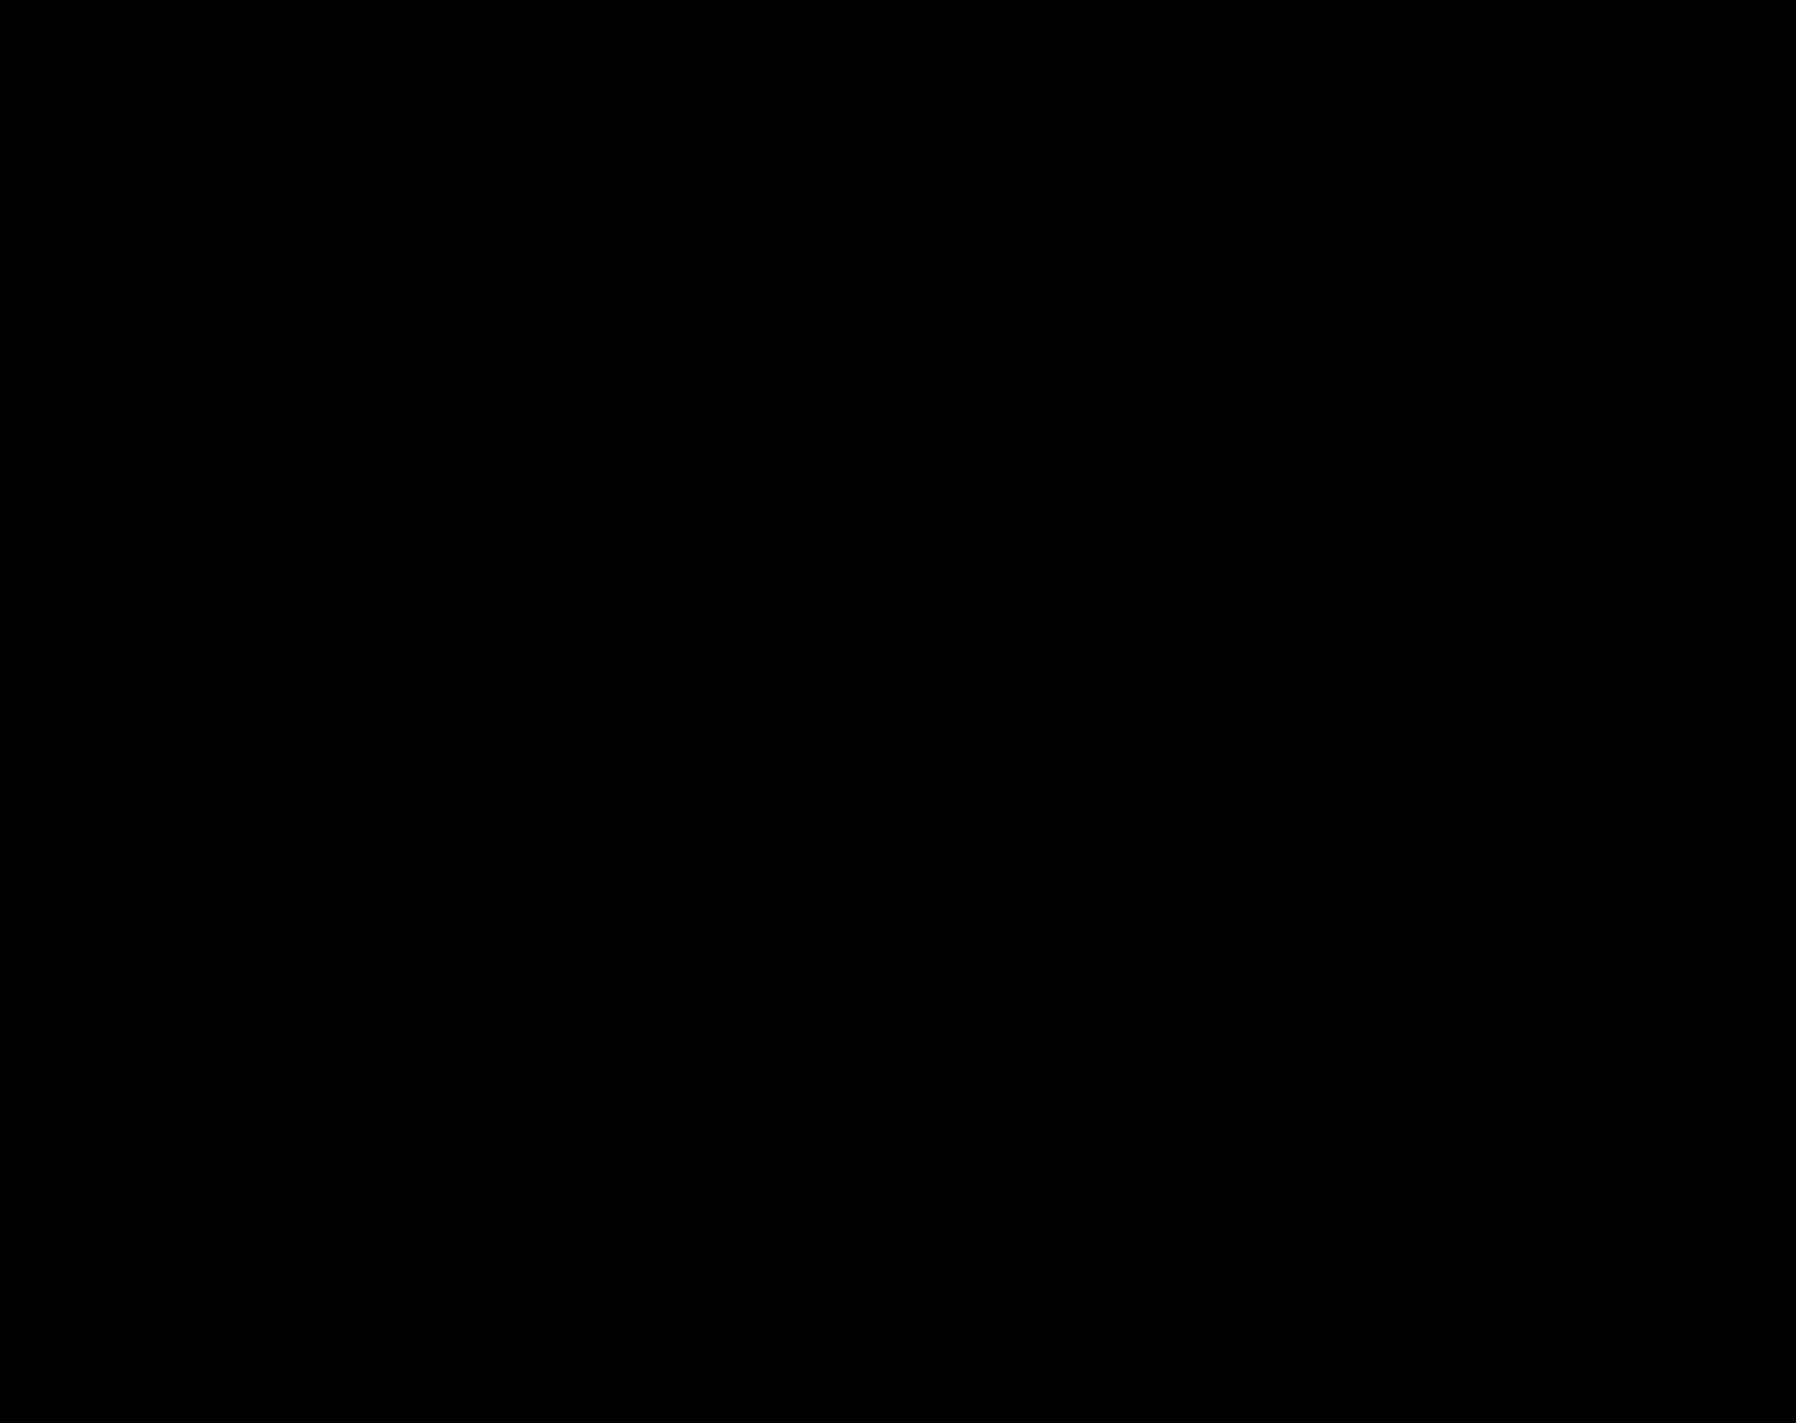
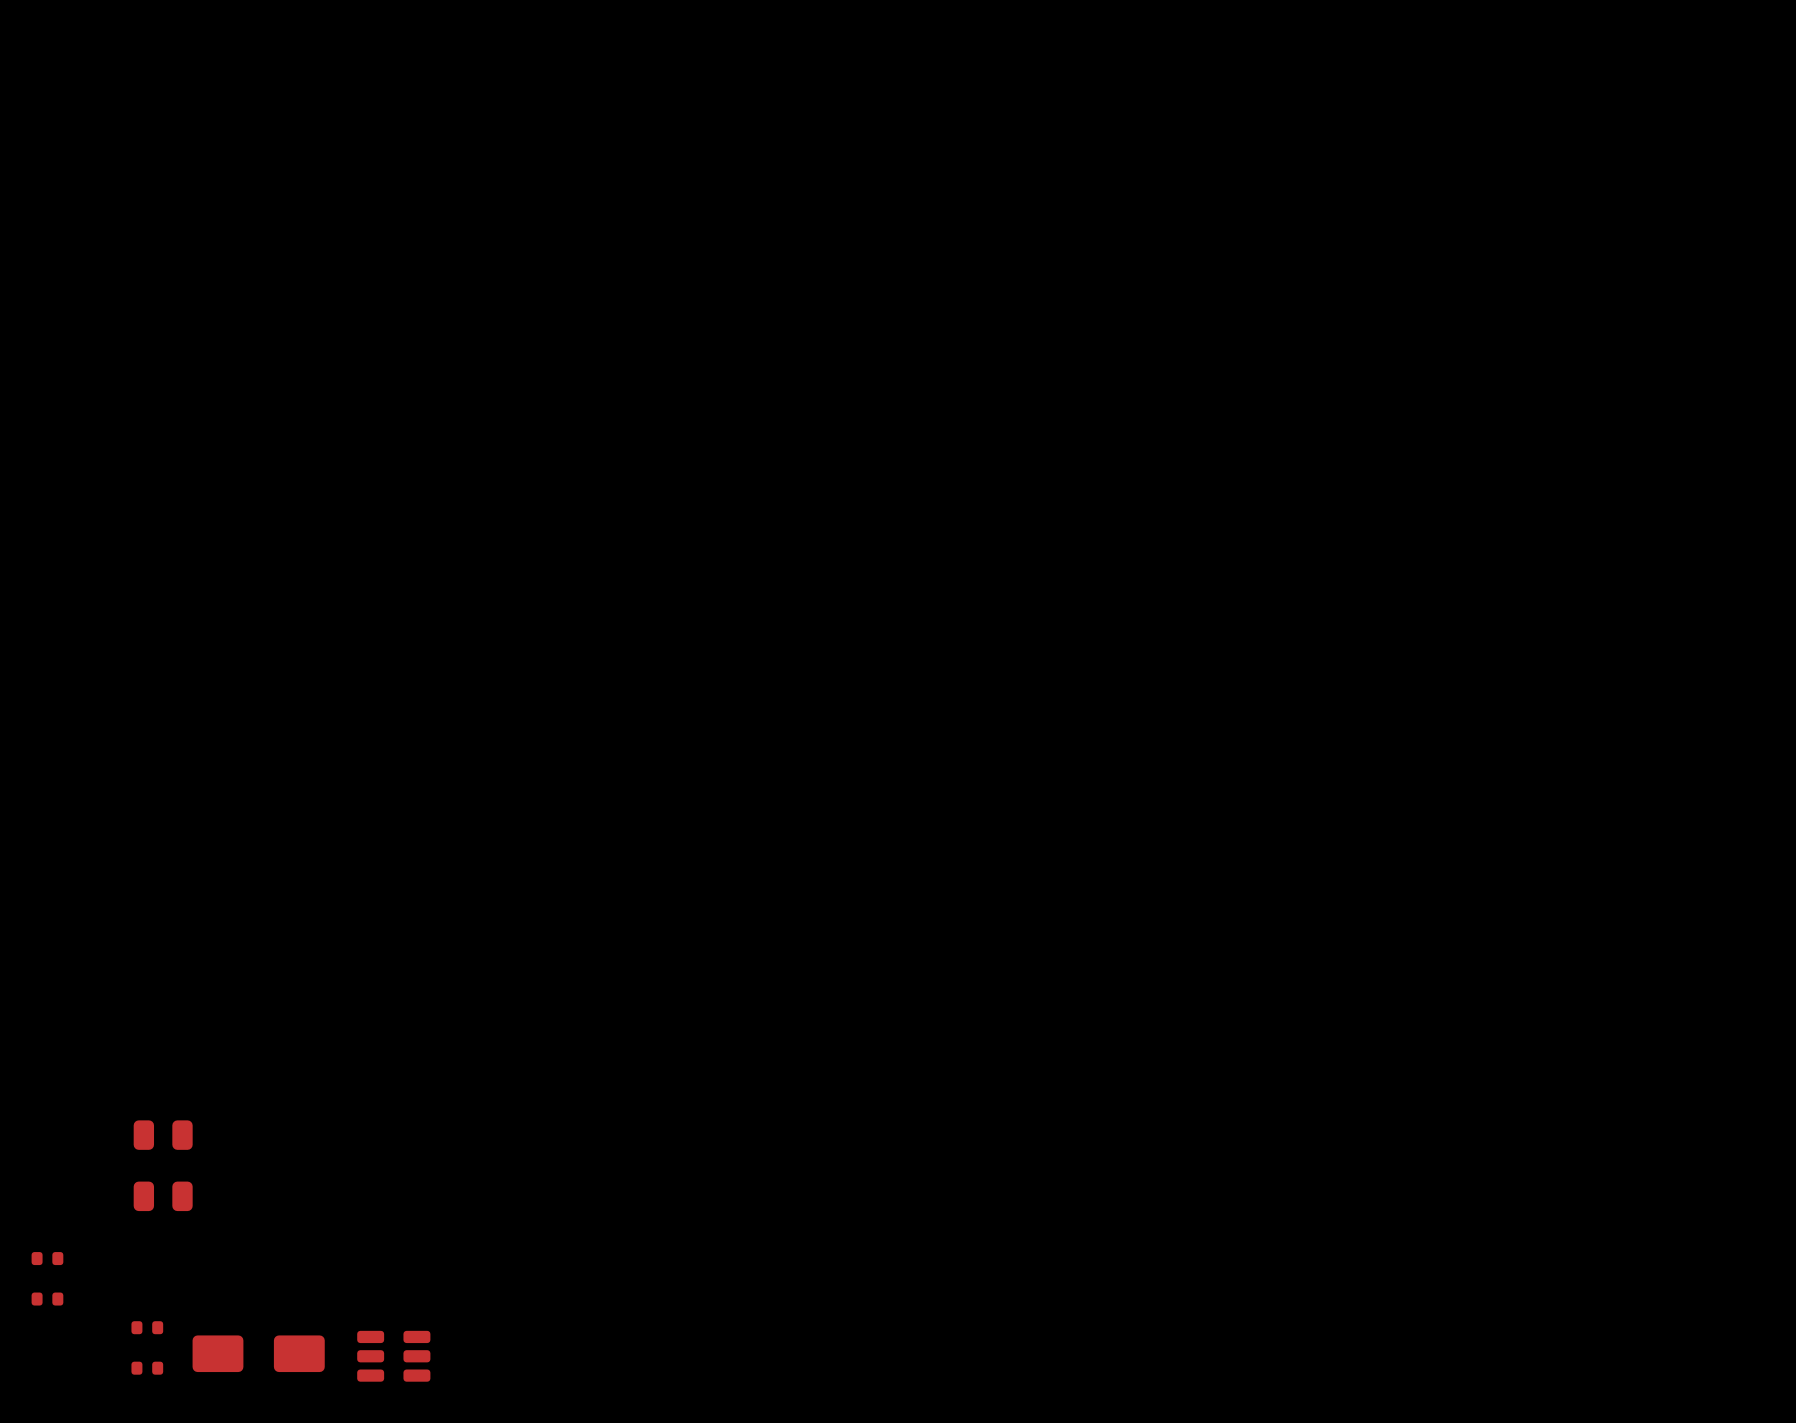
part: none -> (163, 1135)
part: none -> (163, 1196)
part: none -> (47, 1258)
part: none -> (47, 1299)
part: none -> (147, 1327)
part: none -> (258, 1353)
part: none -> (393, 1356)
part: none -> (147, 1368)

